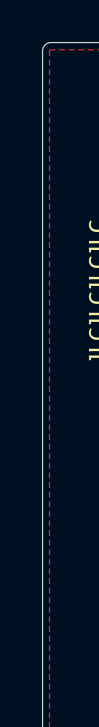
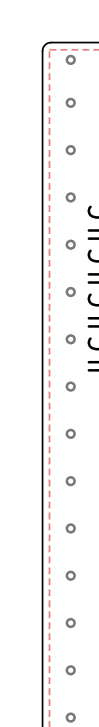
via: none -> (70, 59)
via: none -> (70, 102)
via: none -> (70, 150)
via: none -> (70, 197)
via: none -> (70, 244)
via: none -> (70, 292)
via: none -> (70, 339)
via: none -> (70, 386)
via: none -> (70, 433)
via: none -> (70, 481)
via: none -> (70, 528)
via: none -> (70, 575)
via: none -> (70, 623)
via: none -> (70, 670)
via: none -> (70, 717)

